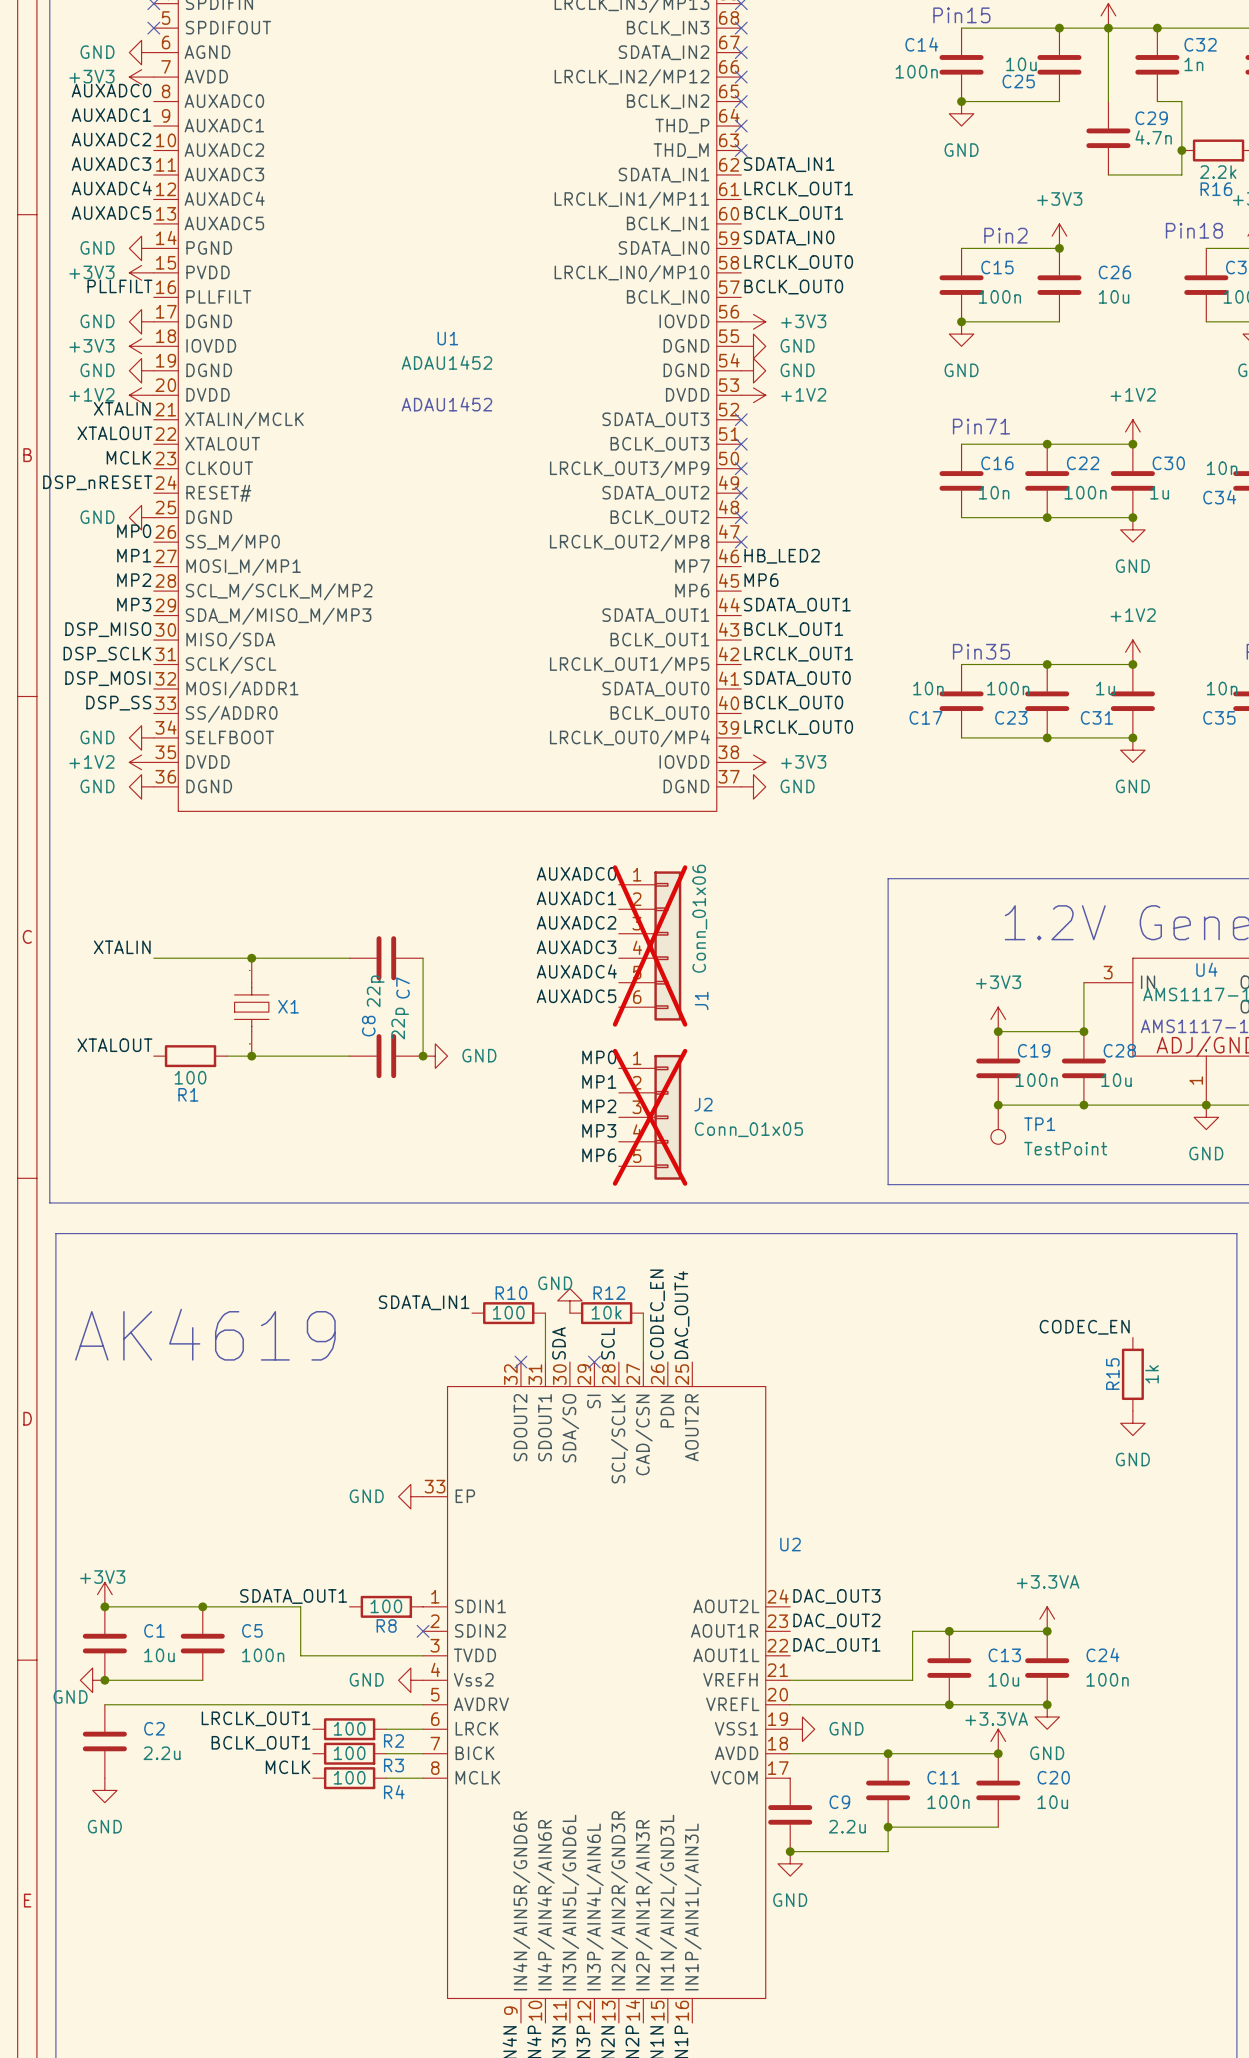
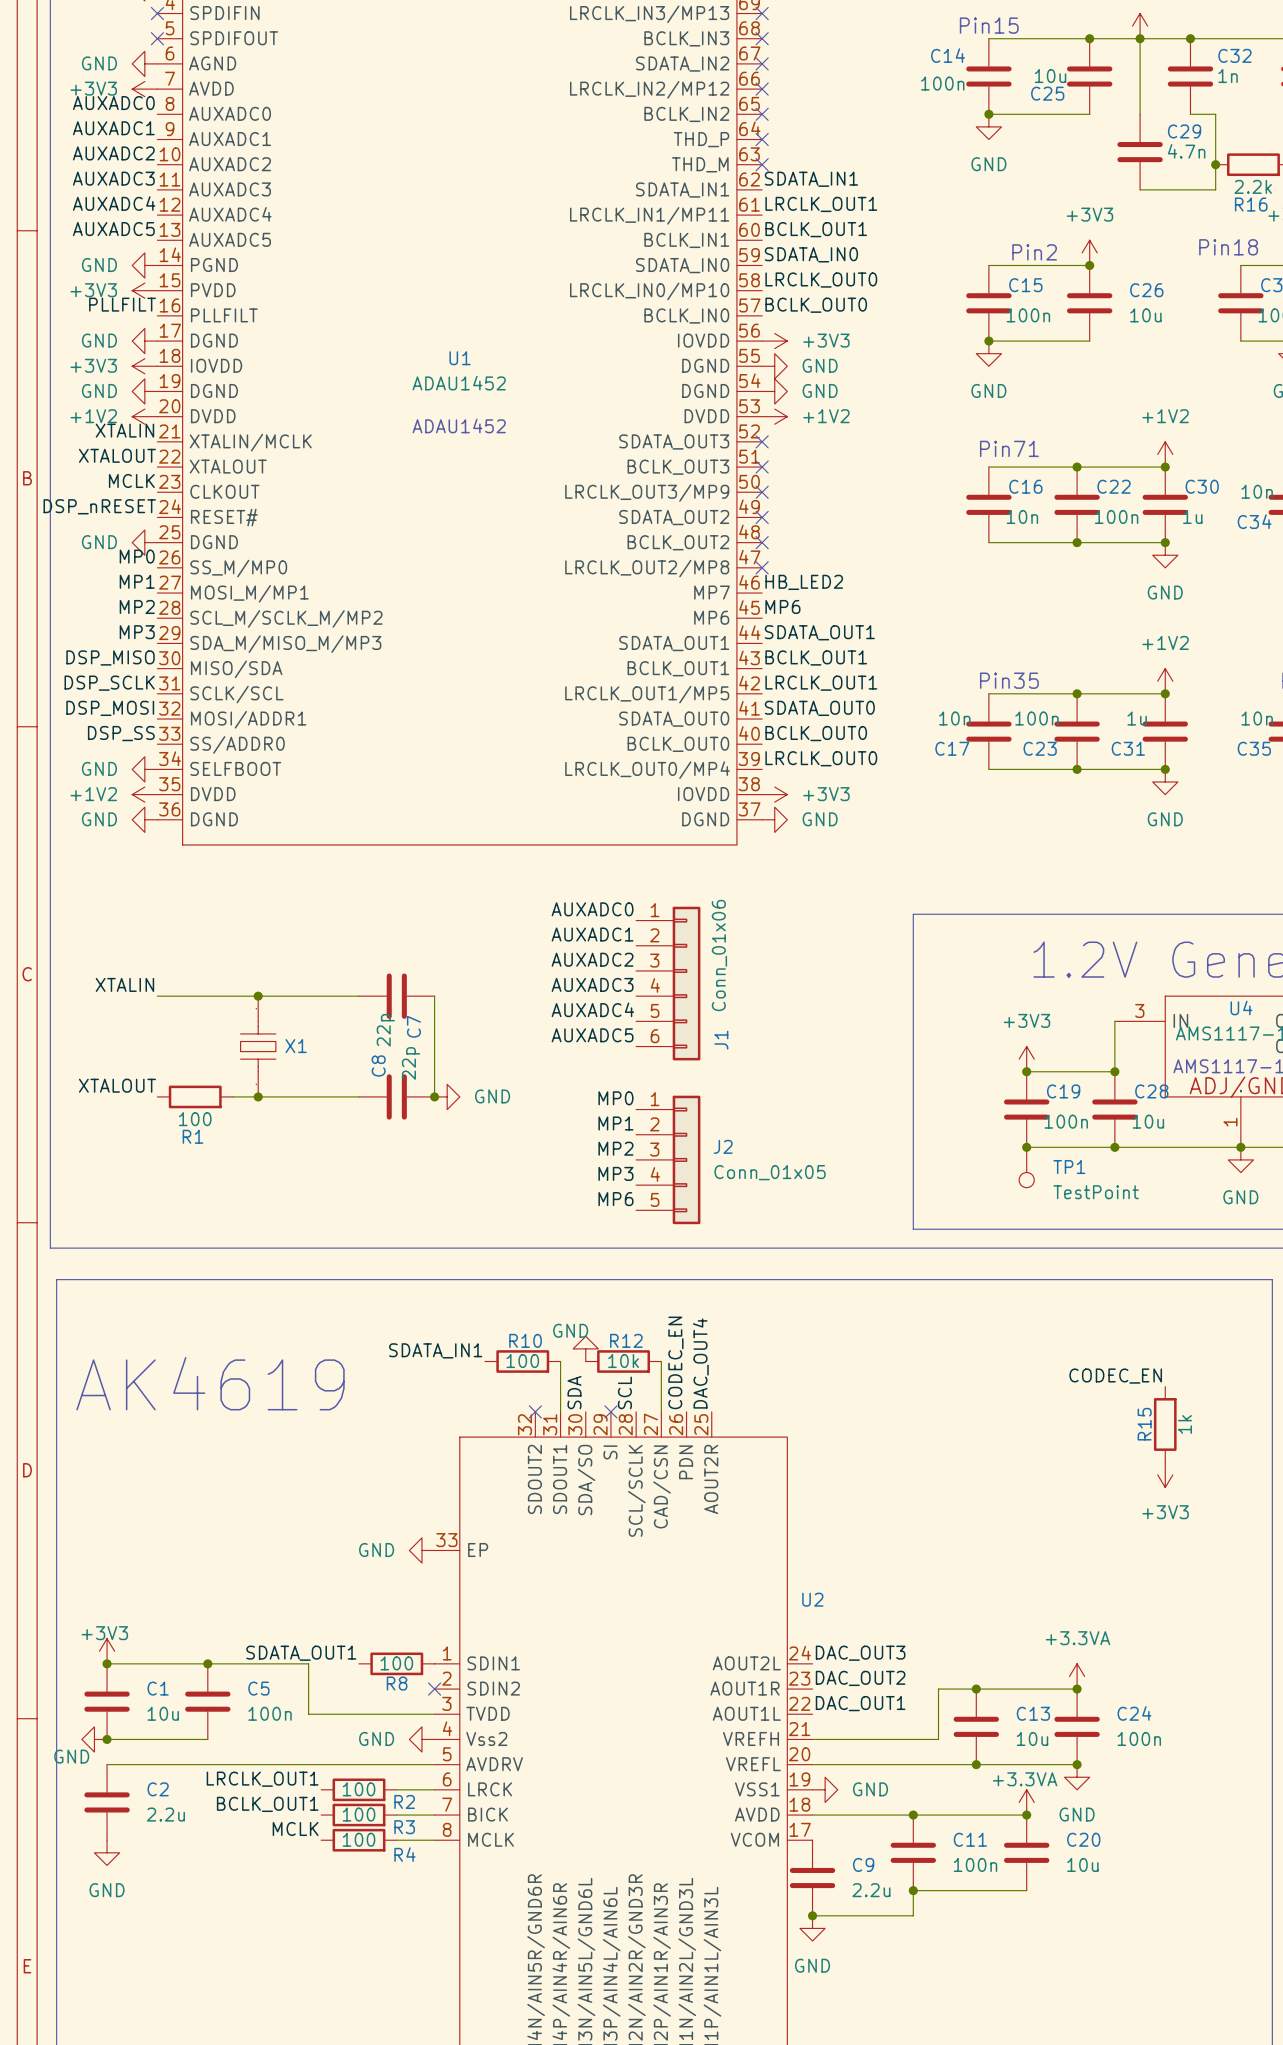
J1 do-not-place cross: (650, 945) -> none
J2 do-not-place cross: (650, 1117) -> none
power symbol: GND (1132, 1423) -> +3V3 (1165, 1474)

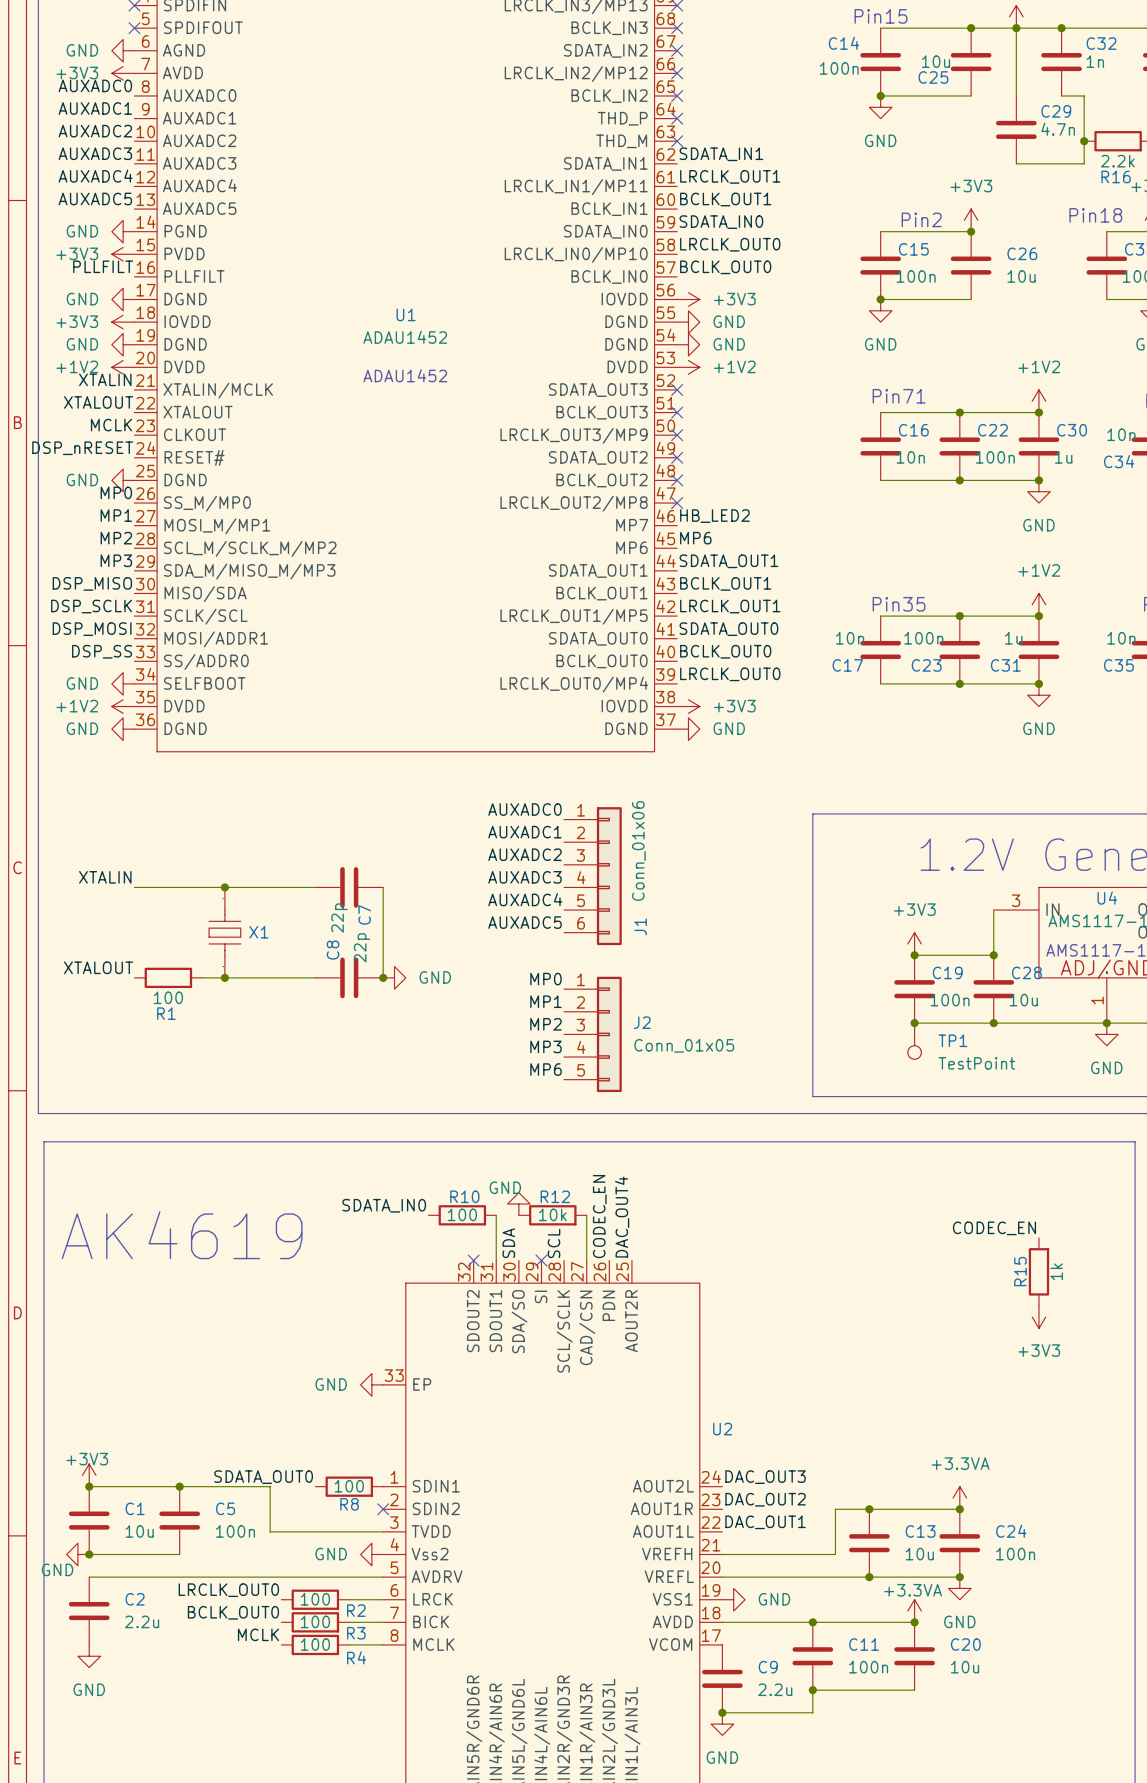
label: SDATA_IN1 (435, 1350) -> SDATA_IN0 (384, 1205)
label: SDATA_OUT1 (301, 1653) -> SDATA_OUT0 (263, 1477)
label: LRCLK_OUT1 (262, 1779) -> LRCLK_OUT0 (228, 1590)
label: BCLK_OUT1 (267, 1804) -> BCLK_OUT0 (233, 1612)

